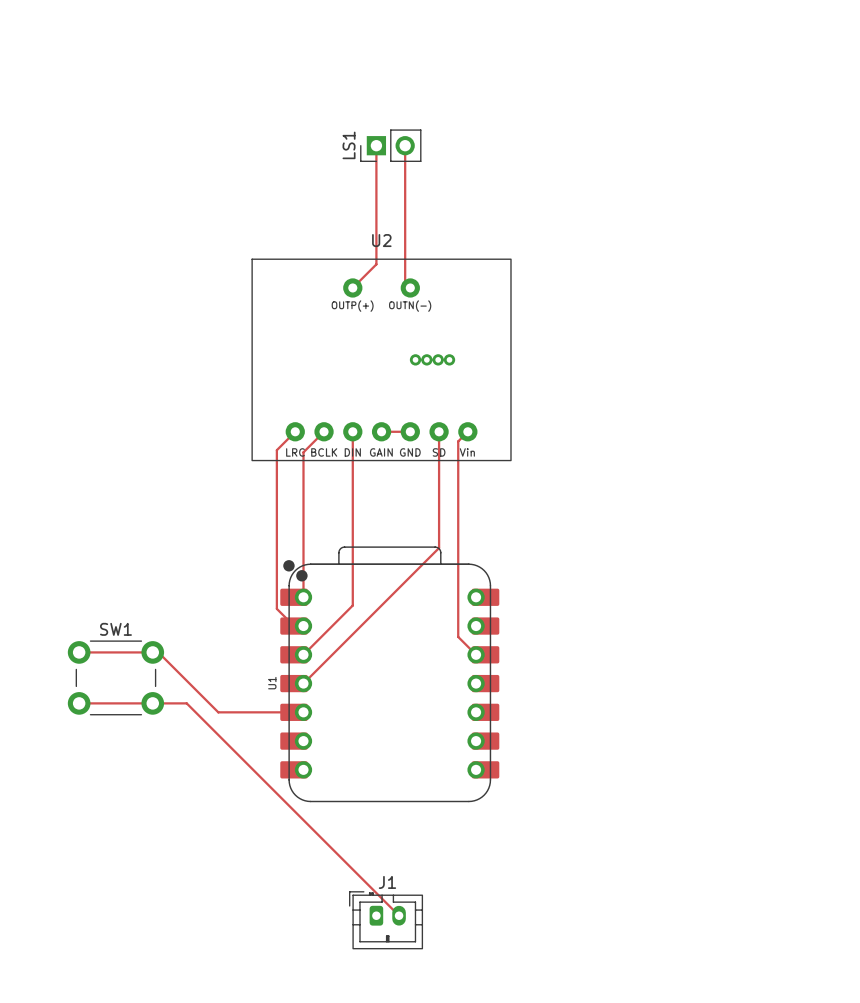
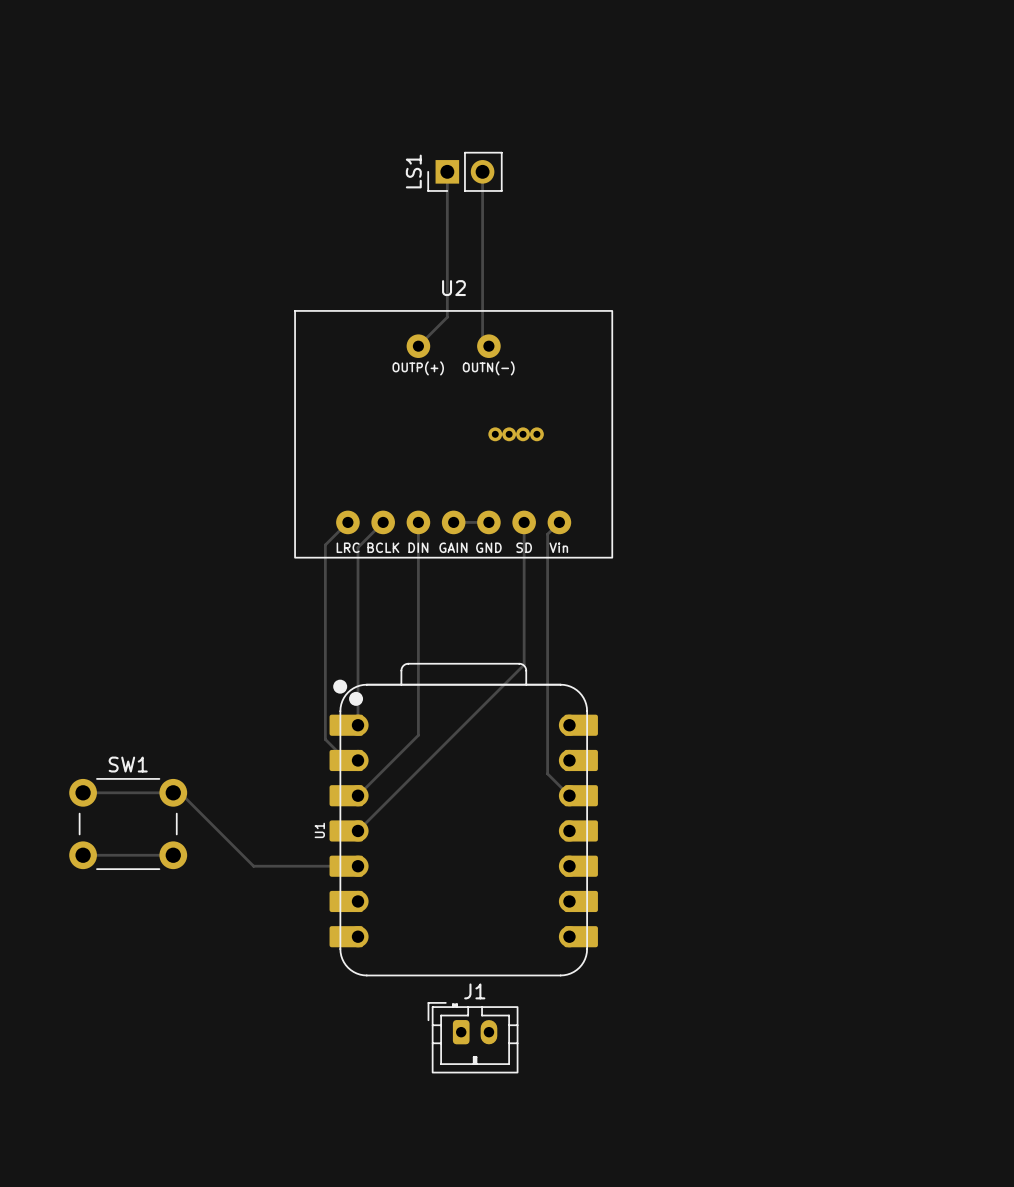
track: (152, 703) (186, 703) (399, 915) -> none
J1 position: (386, 920) -> (473, 1037)

